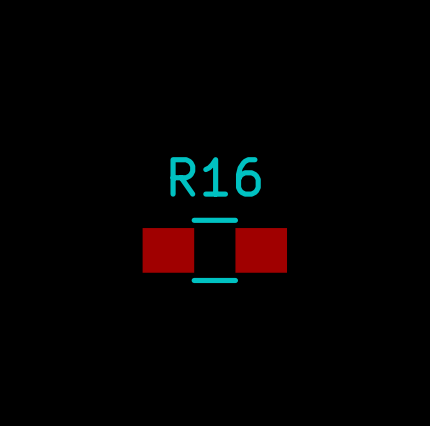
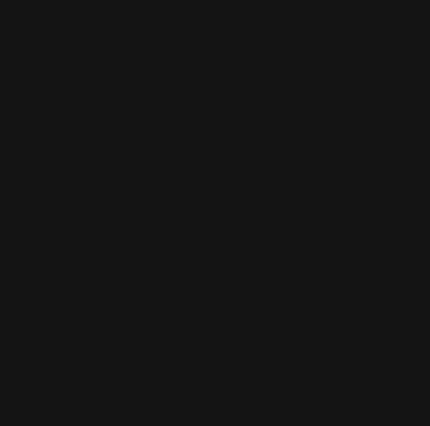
R16: (214, 250) -> none

